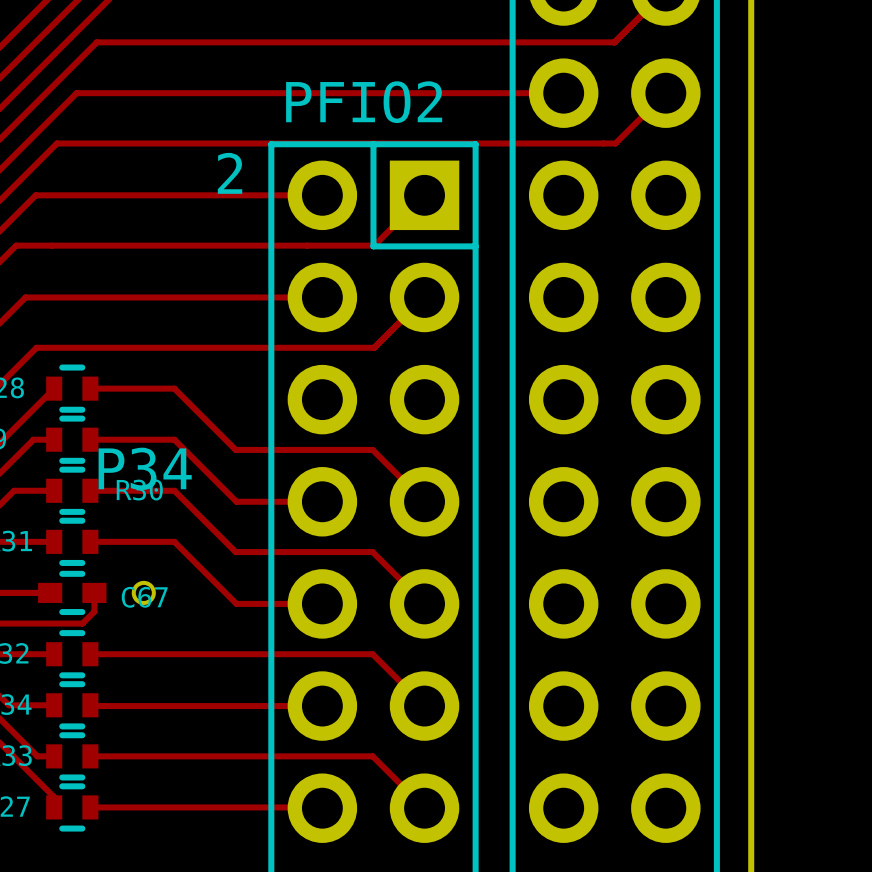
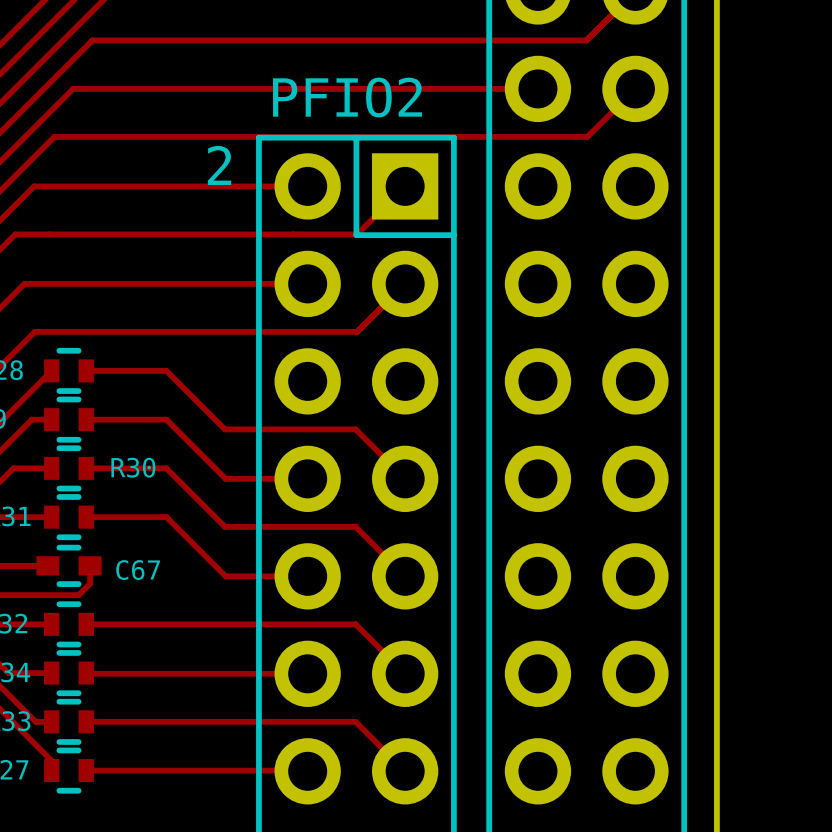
P34: (143, 592) -> none

